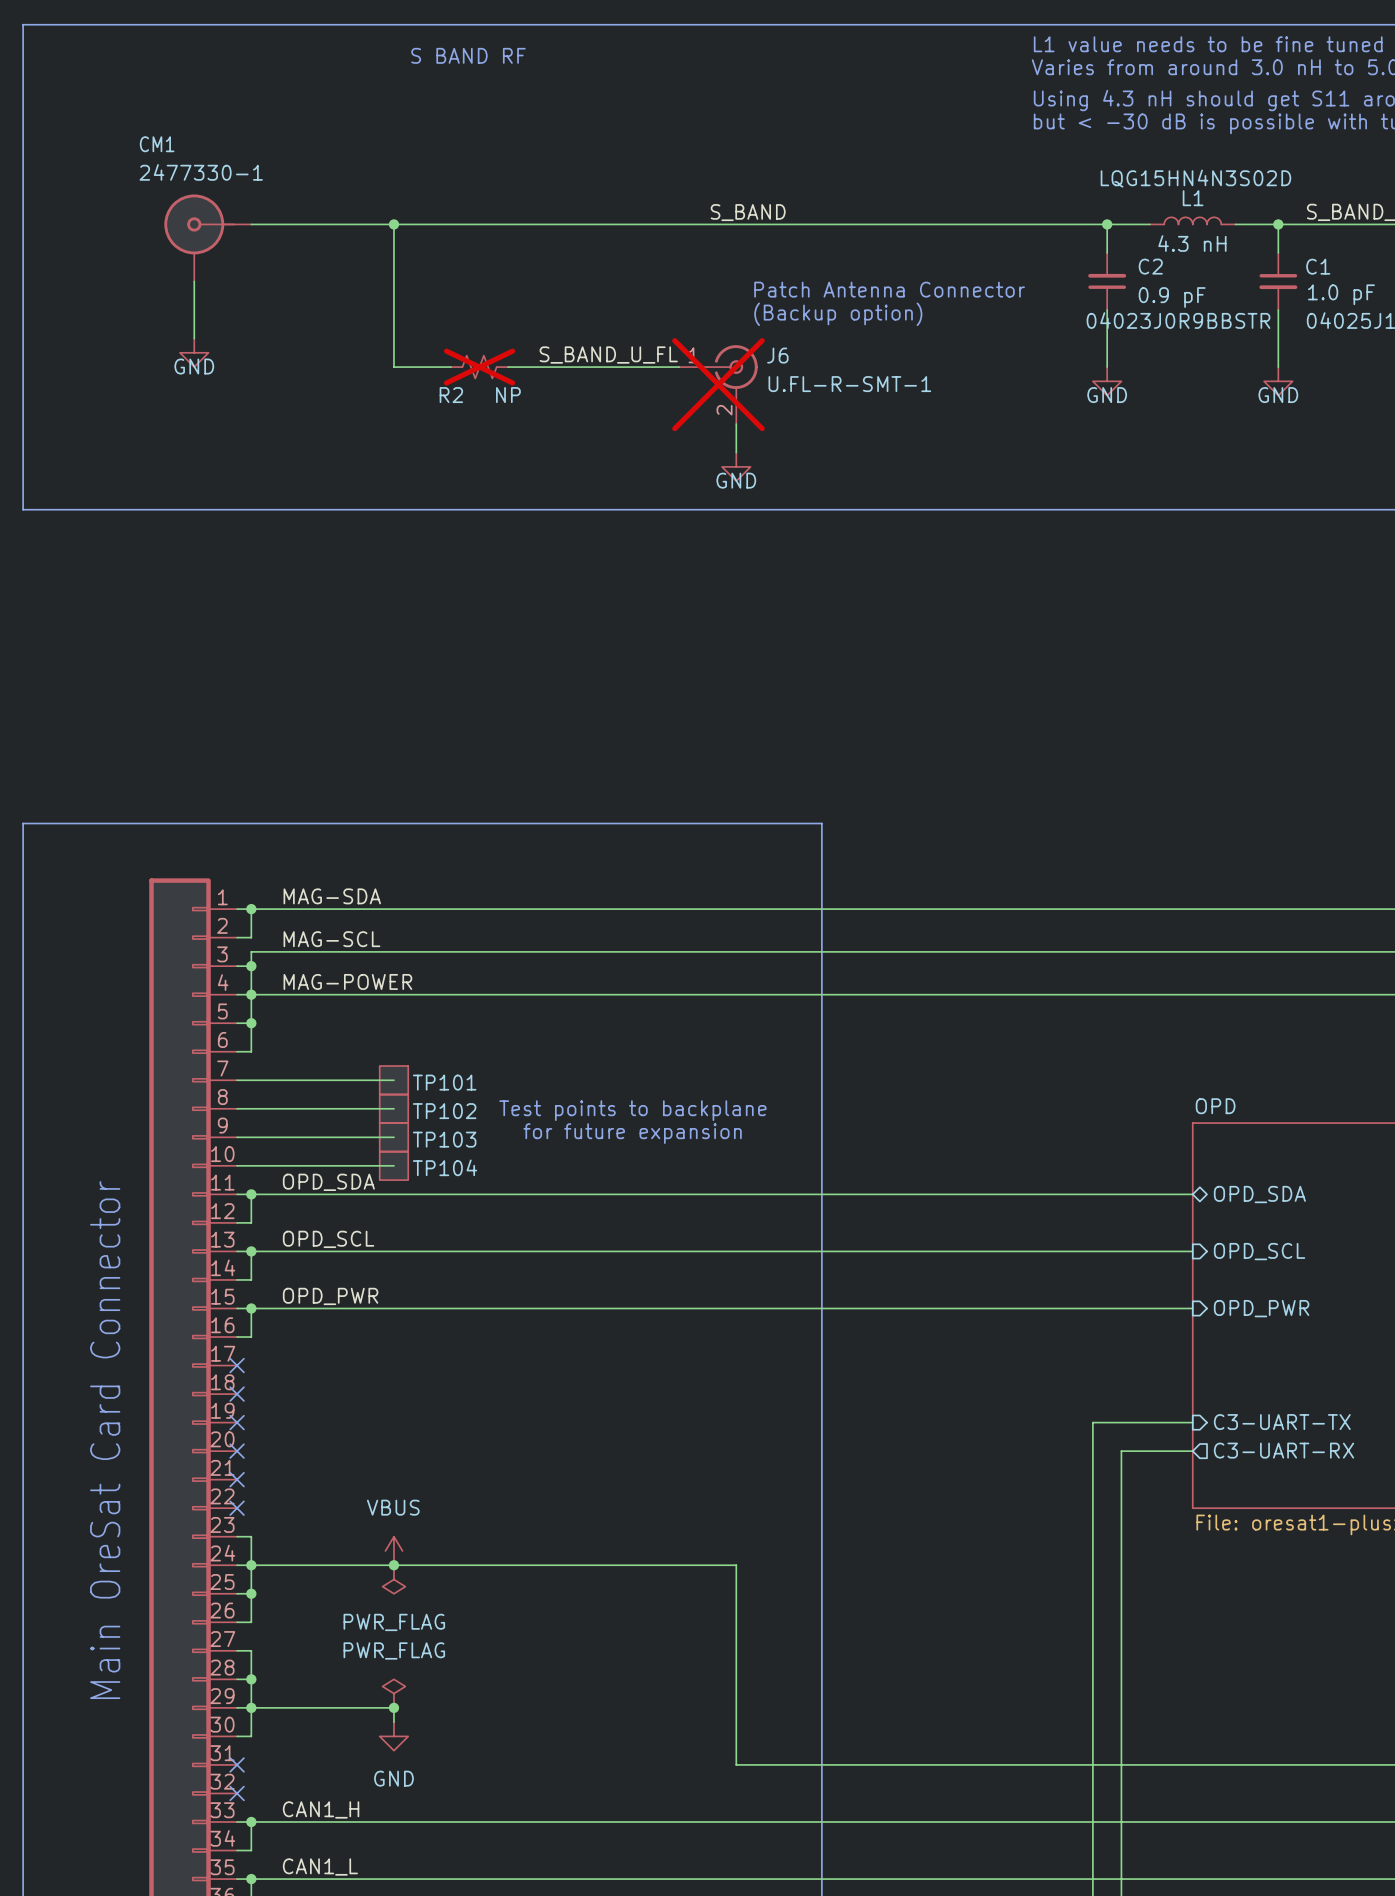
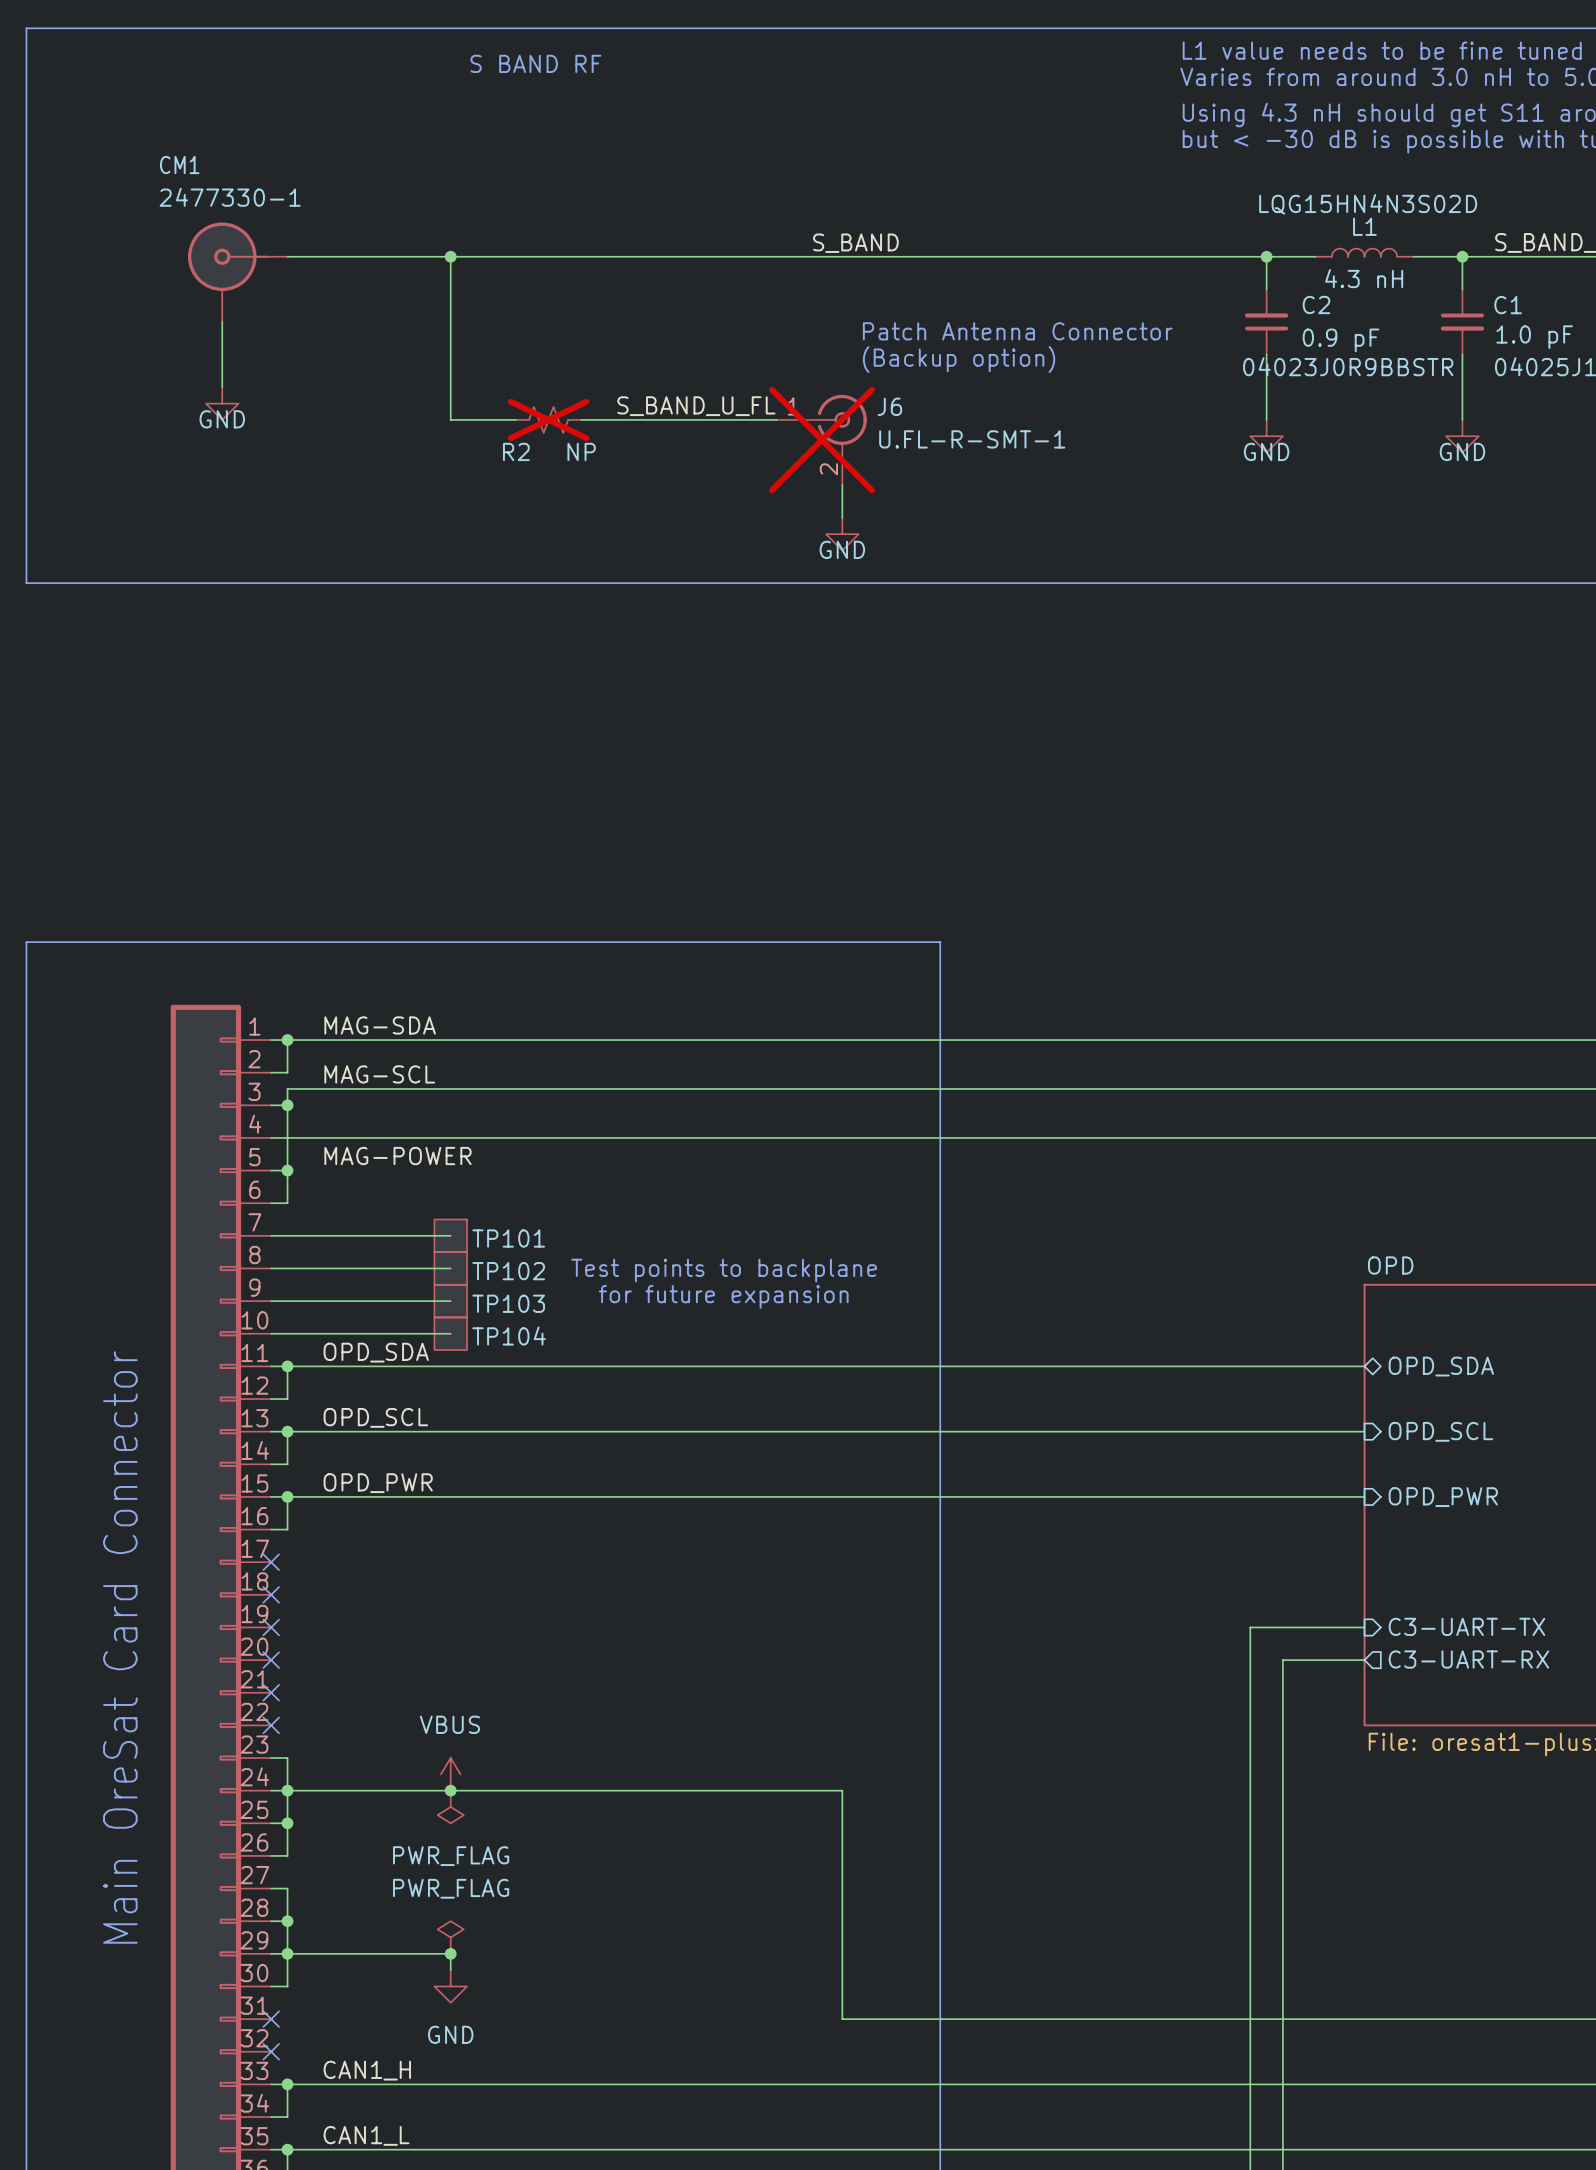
label position: MAG-POWER (347, 981) -> MAG-POWER (397, 1156)
junction: (251, 994) -> none

